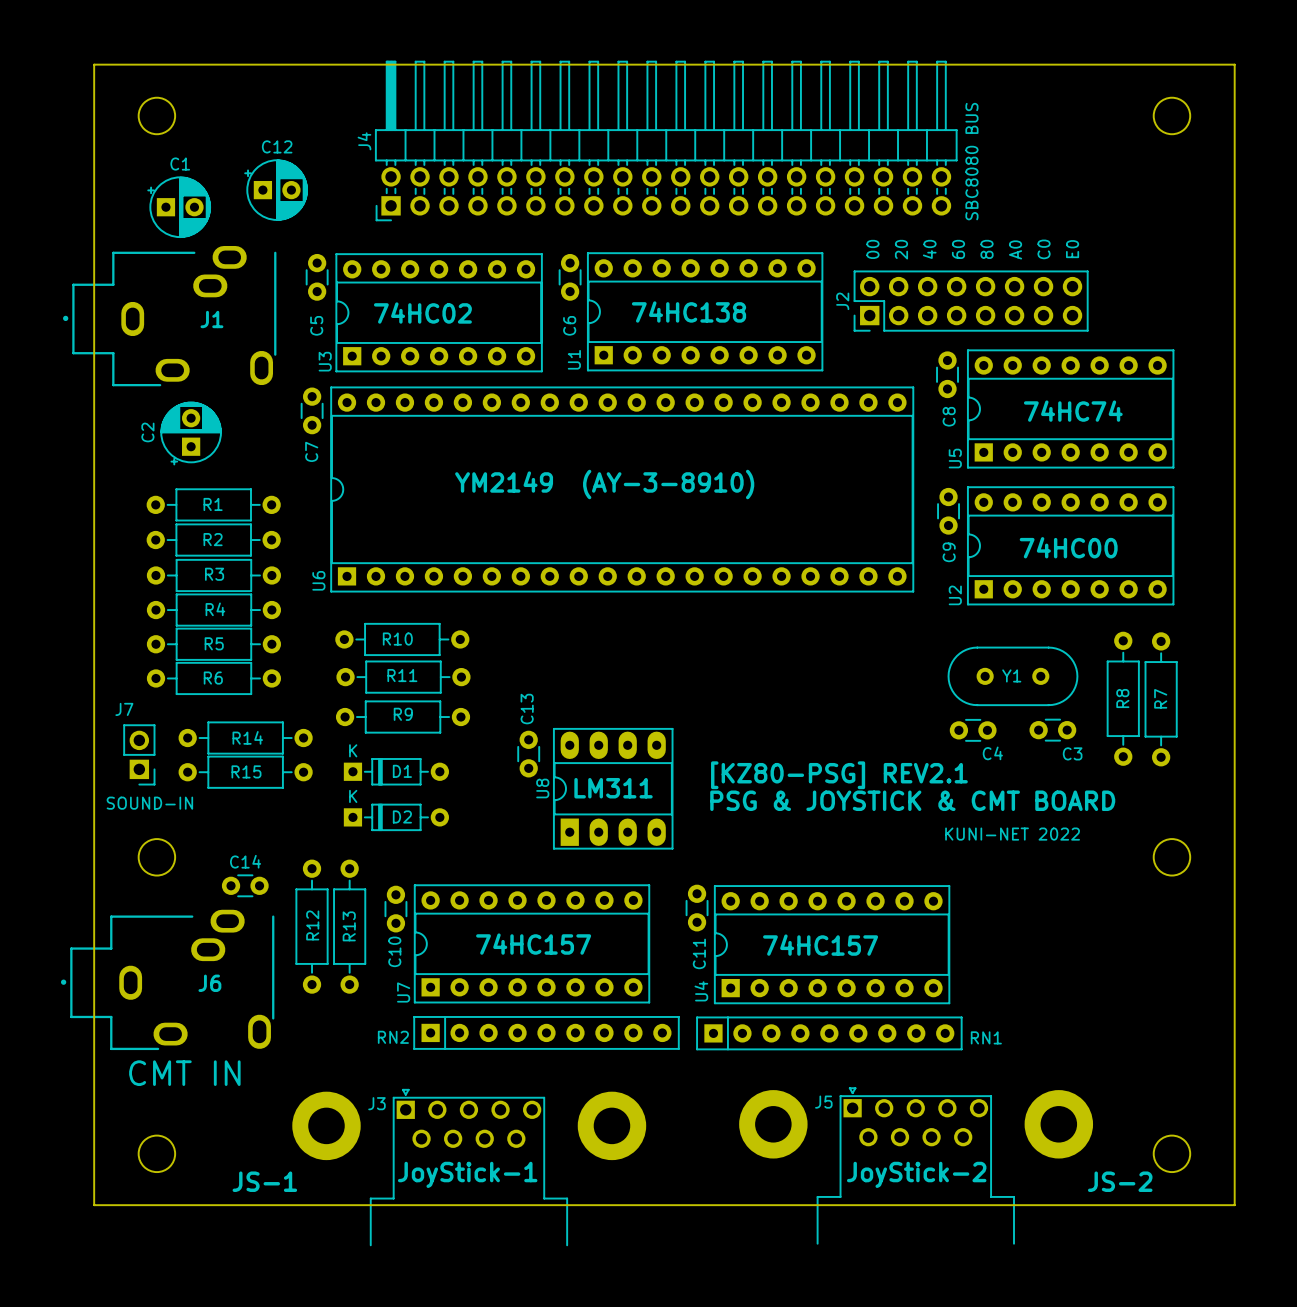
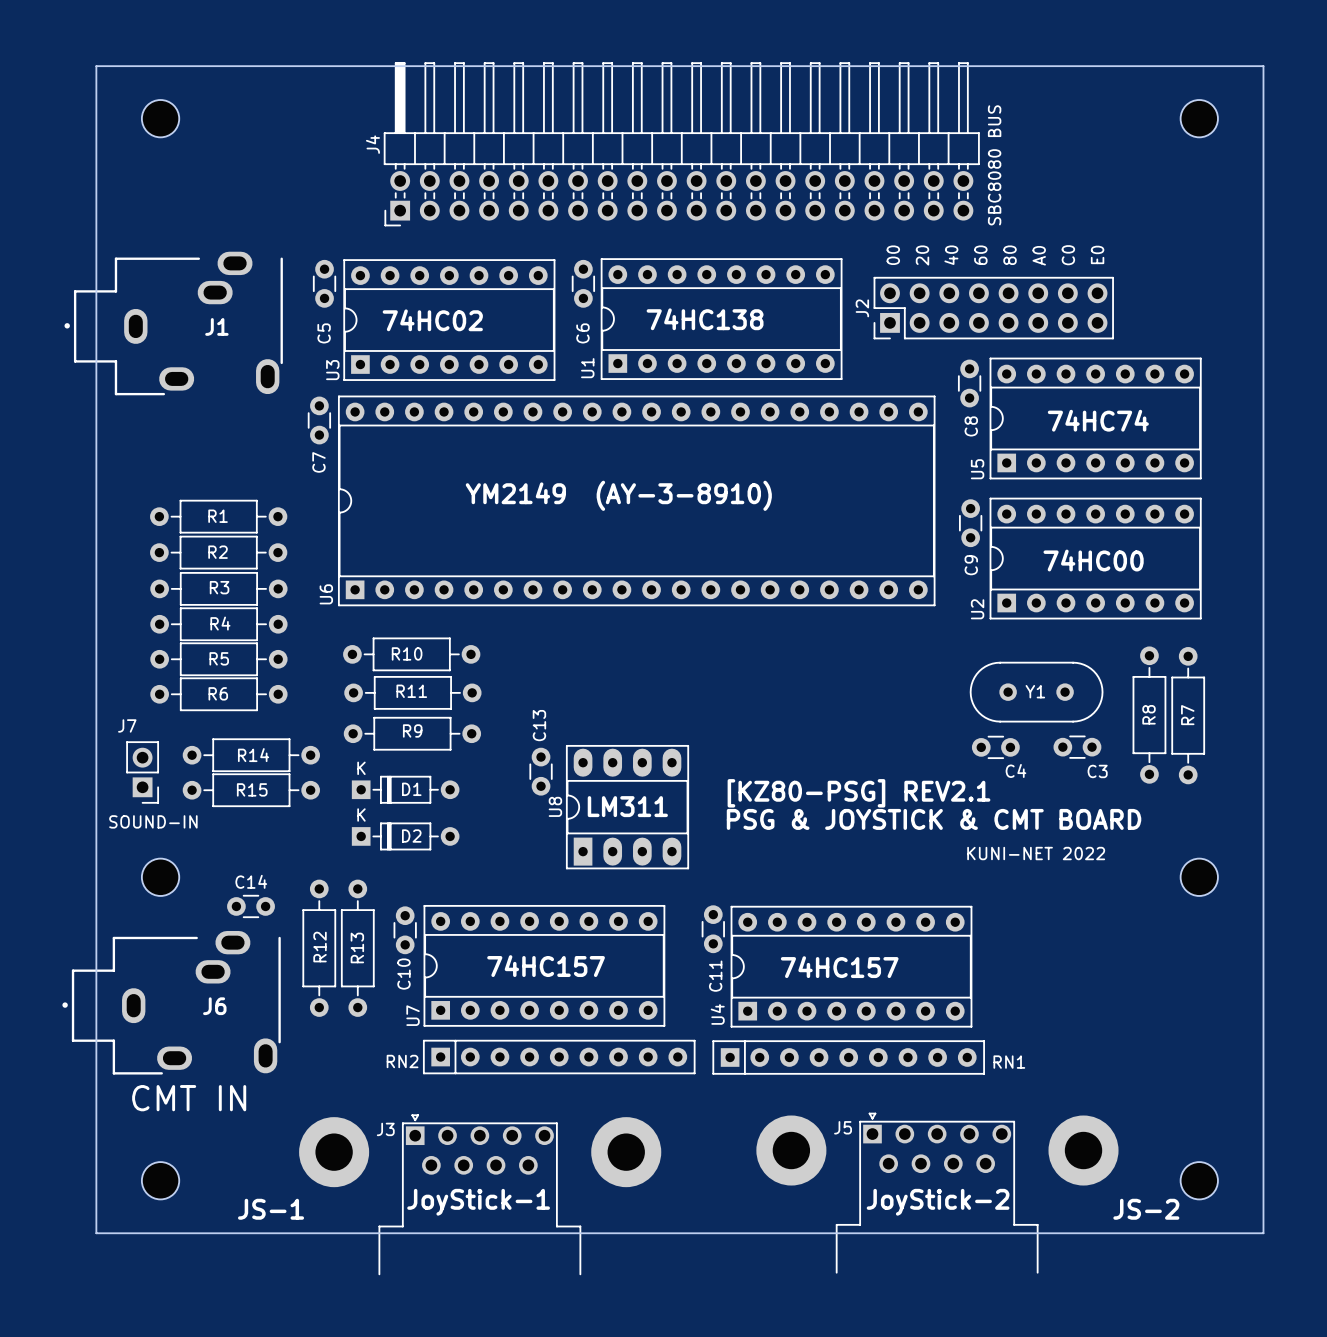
C12: (276, 190) -> none
C1: (179, 207) -> none
C2: (191, 433) -> none

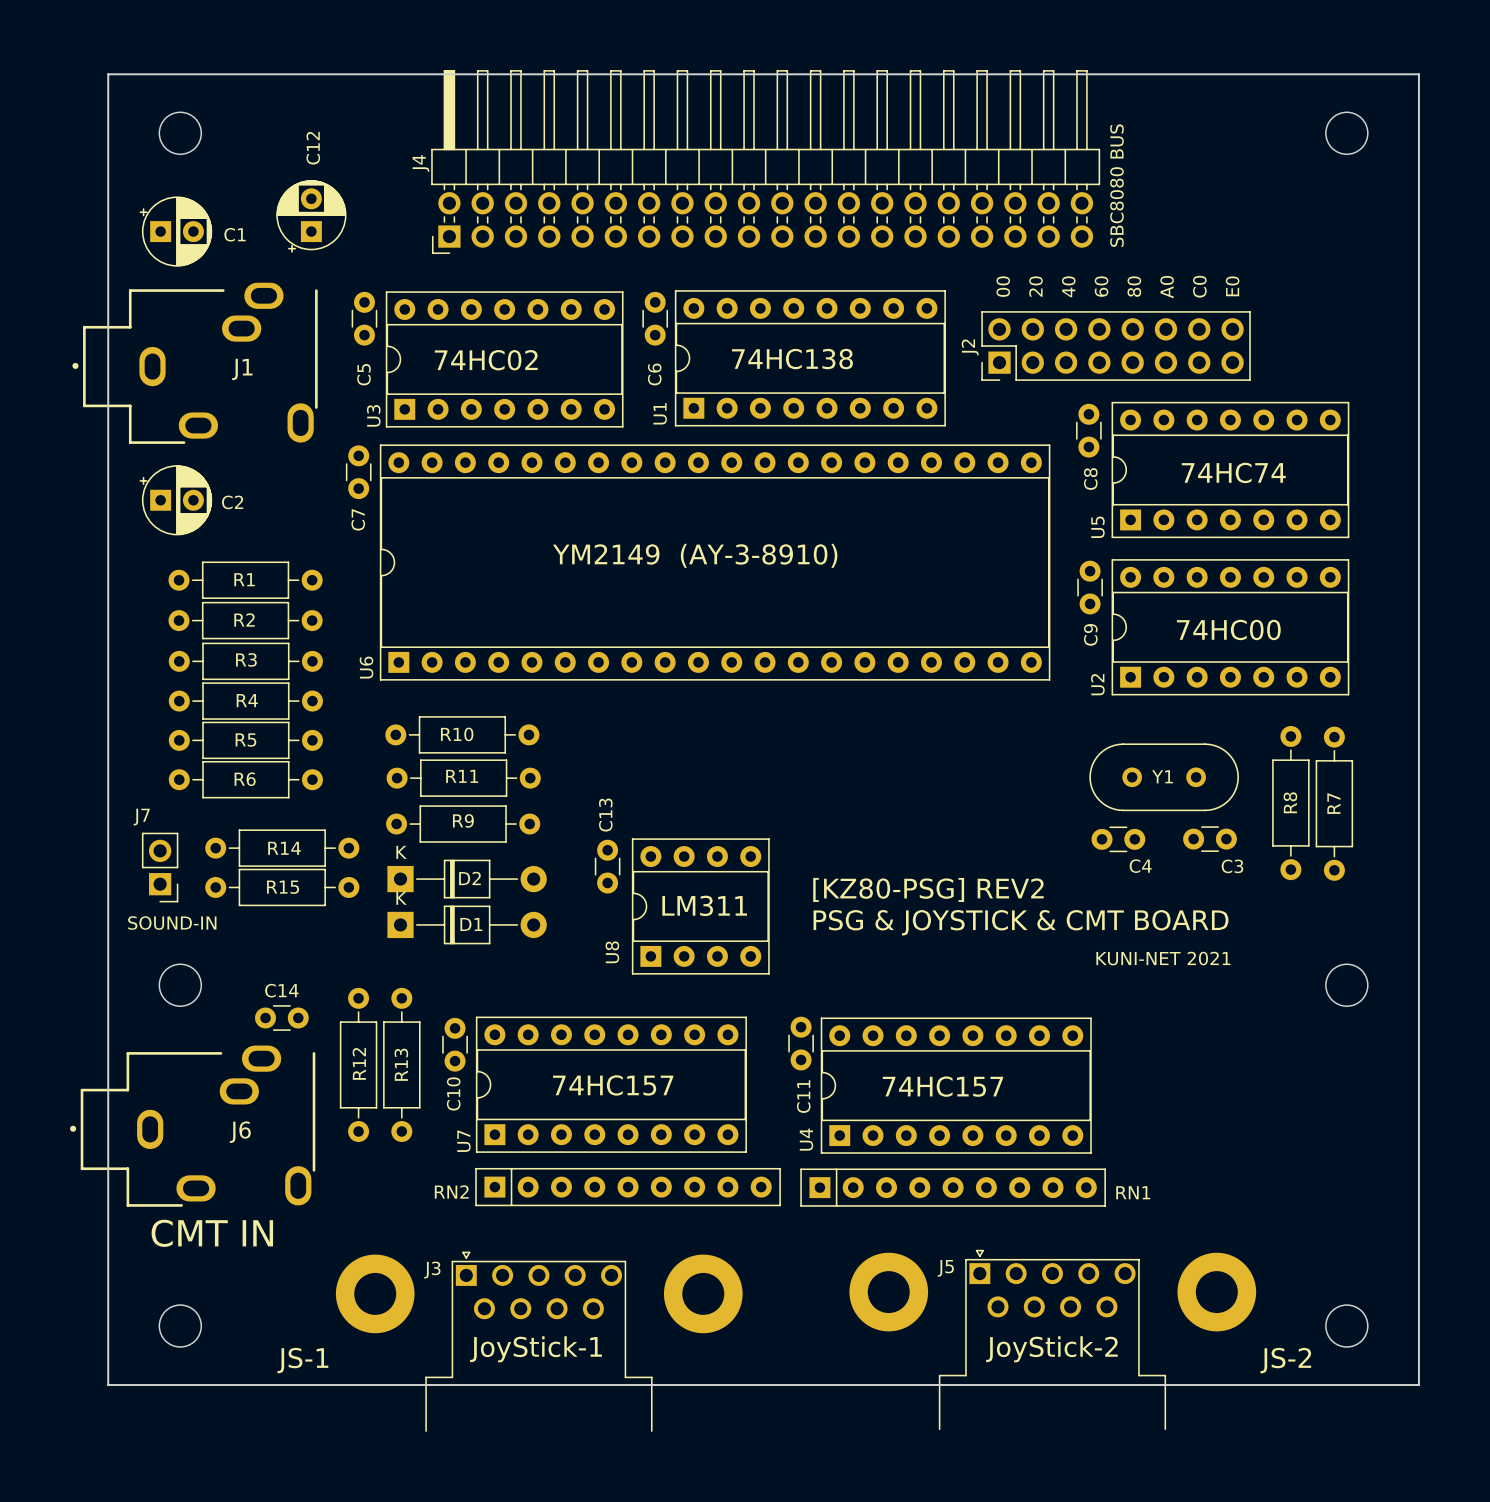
C12: none -> (311, 216)
C1: none -> (175, 231)
C2: none -> (175, 500)
U8 footprint: [566, 745, 689, 870] -> [631, 838, 770, 975]
D1 footprint: [351, 775, 460, 804] -> [387, 905, 547, 945]
text: [KZ80-PSG] REV2.1 (858, 793) -> [KZ80-PSG] REV2 (928, 889)
U8 name position: U8 (555, 806) -> U8 (612, 952)
D2 footprint: [351, 822, 460, 851] -> [387, 859, 547, 899]
text: KUNI-NET 2022 (1036, 853) -> KUNI-NET 2021 (1163, 958)

